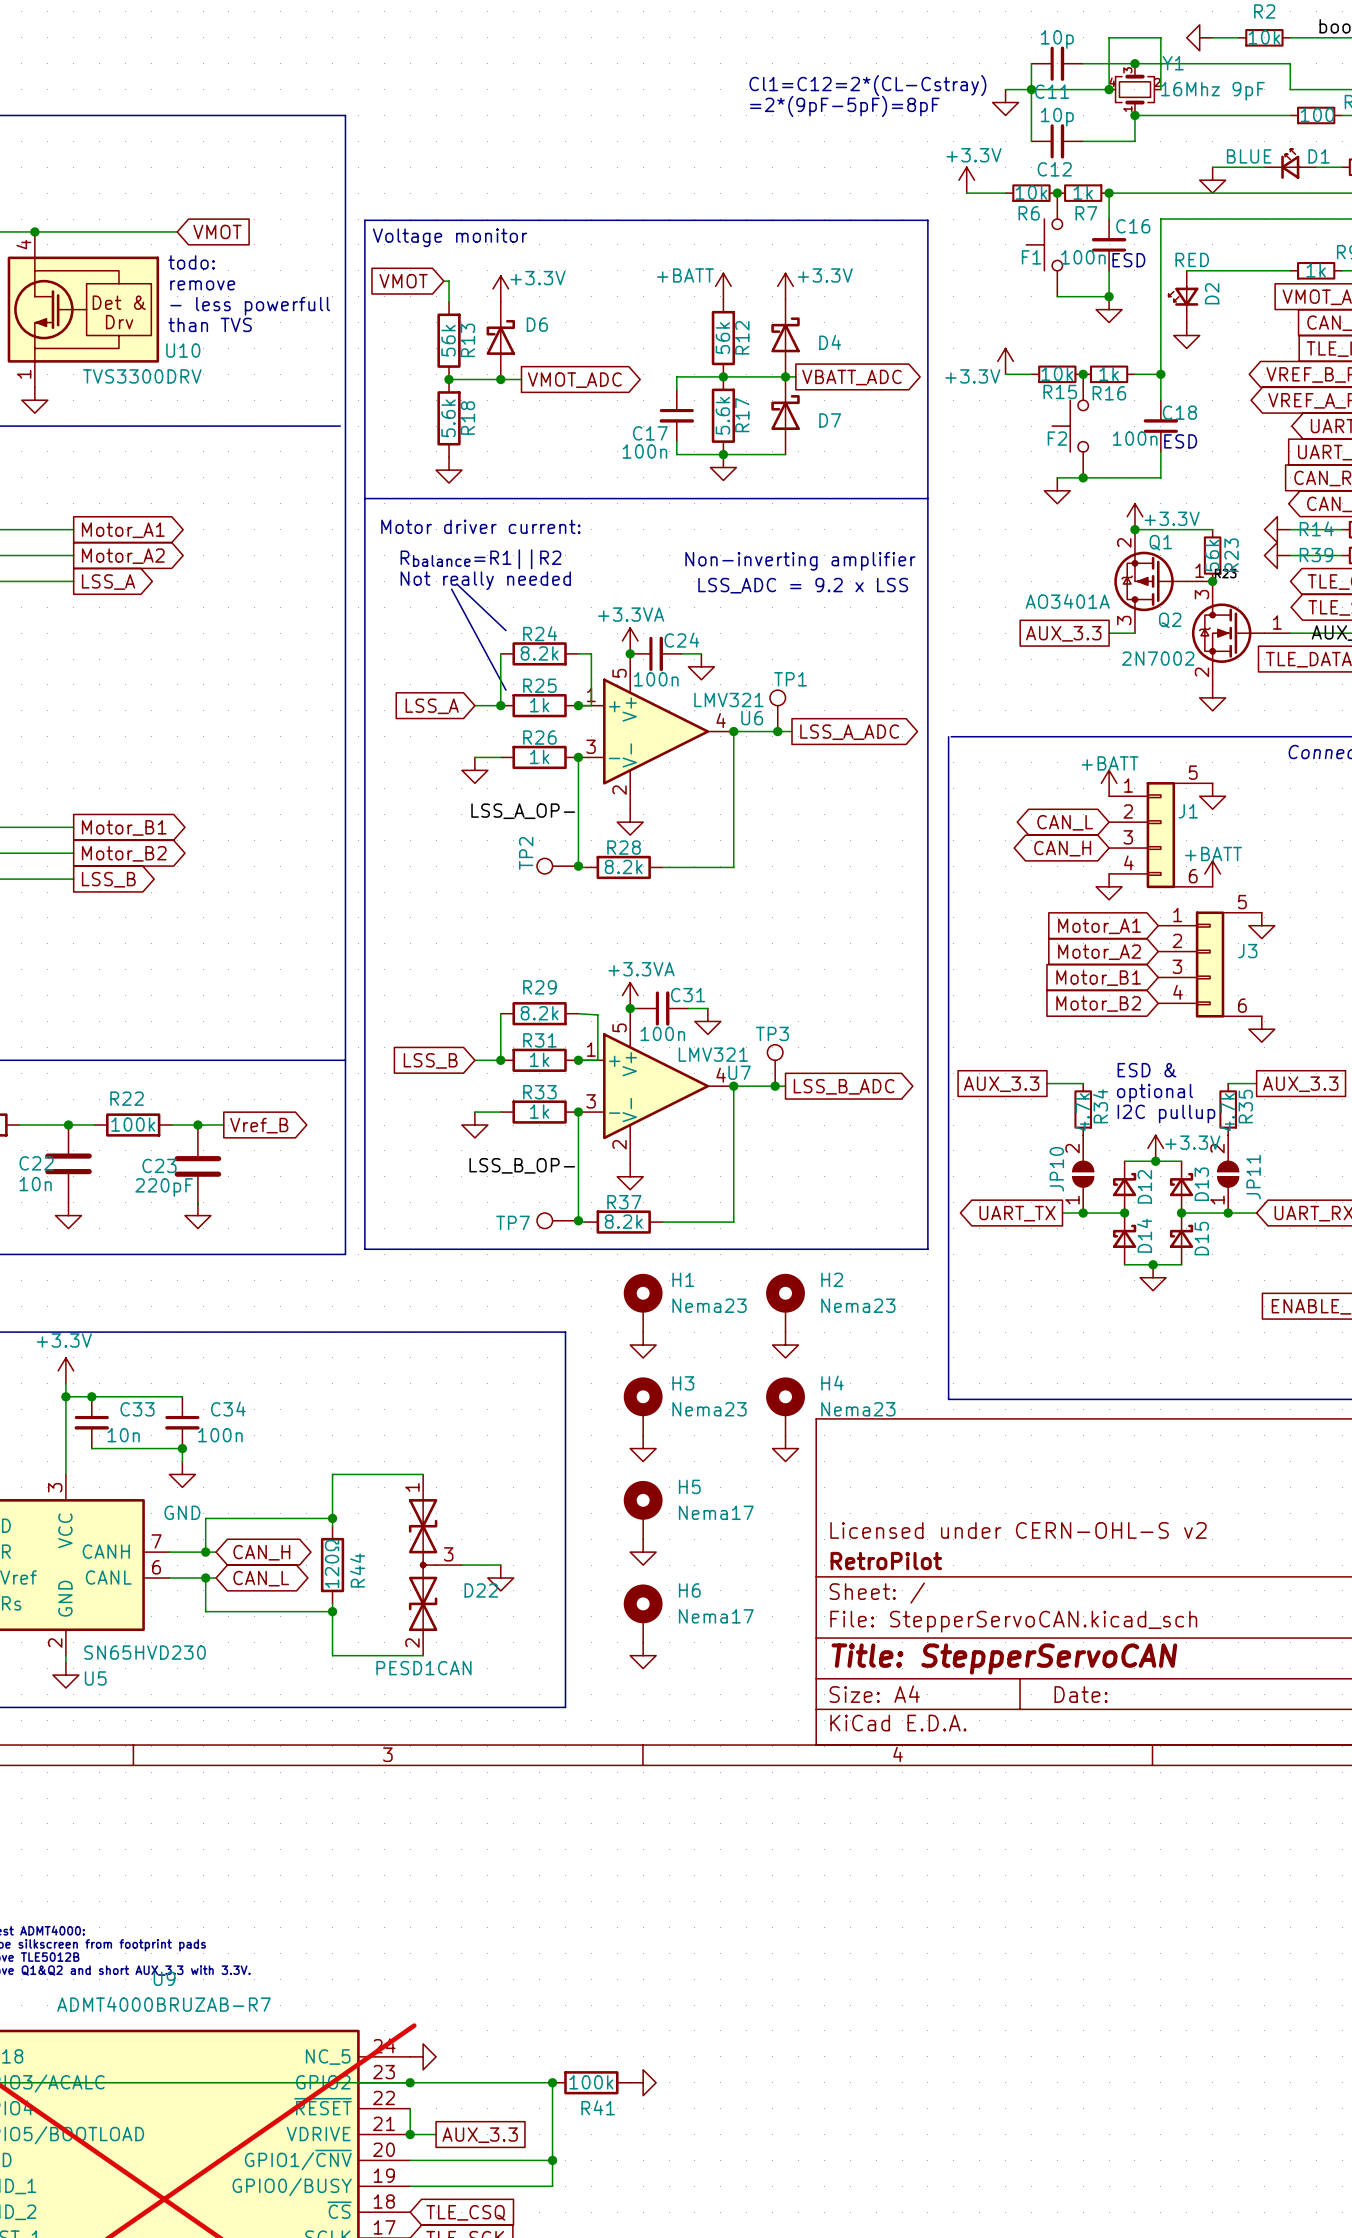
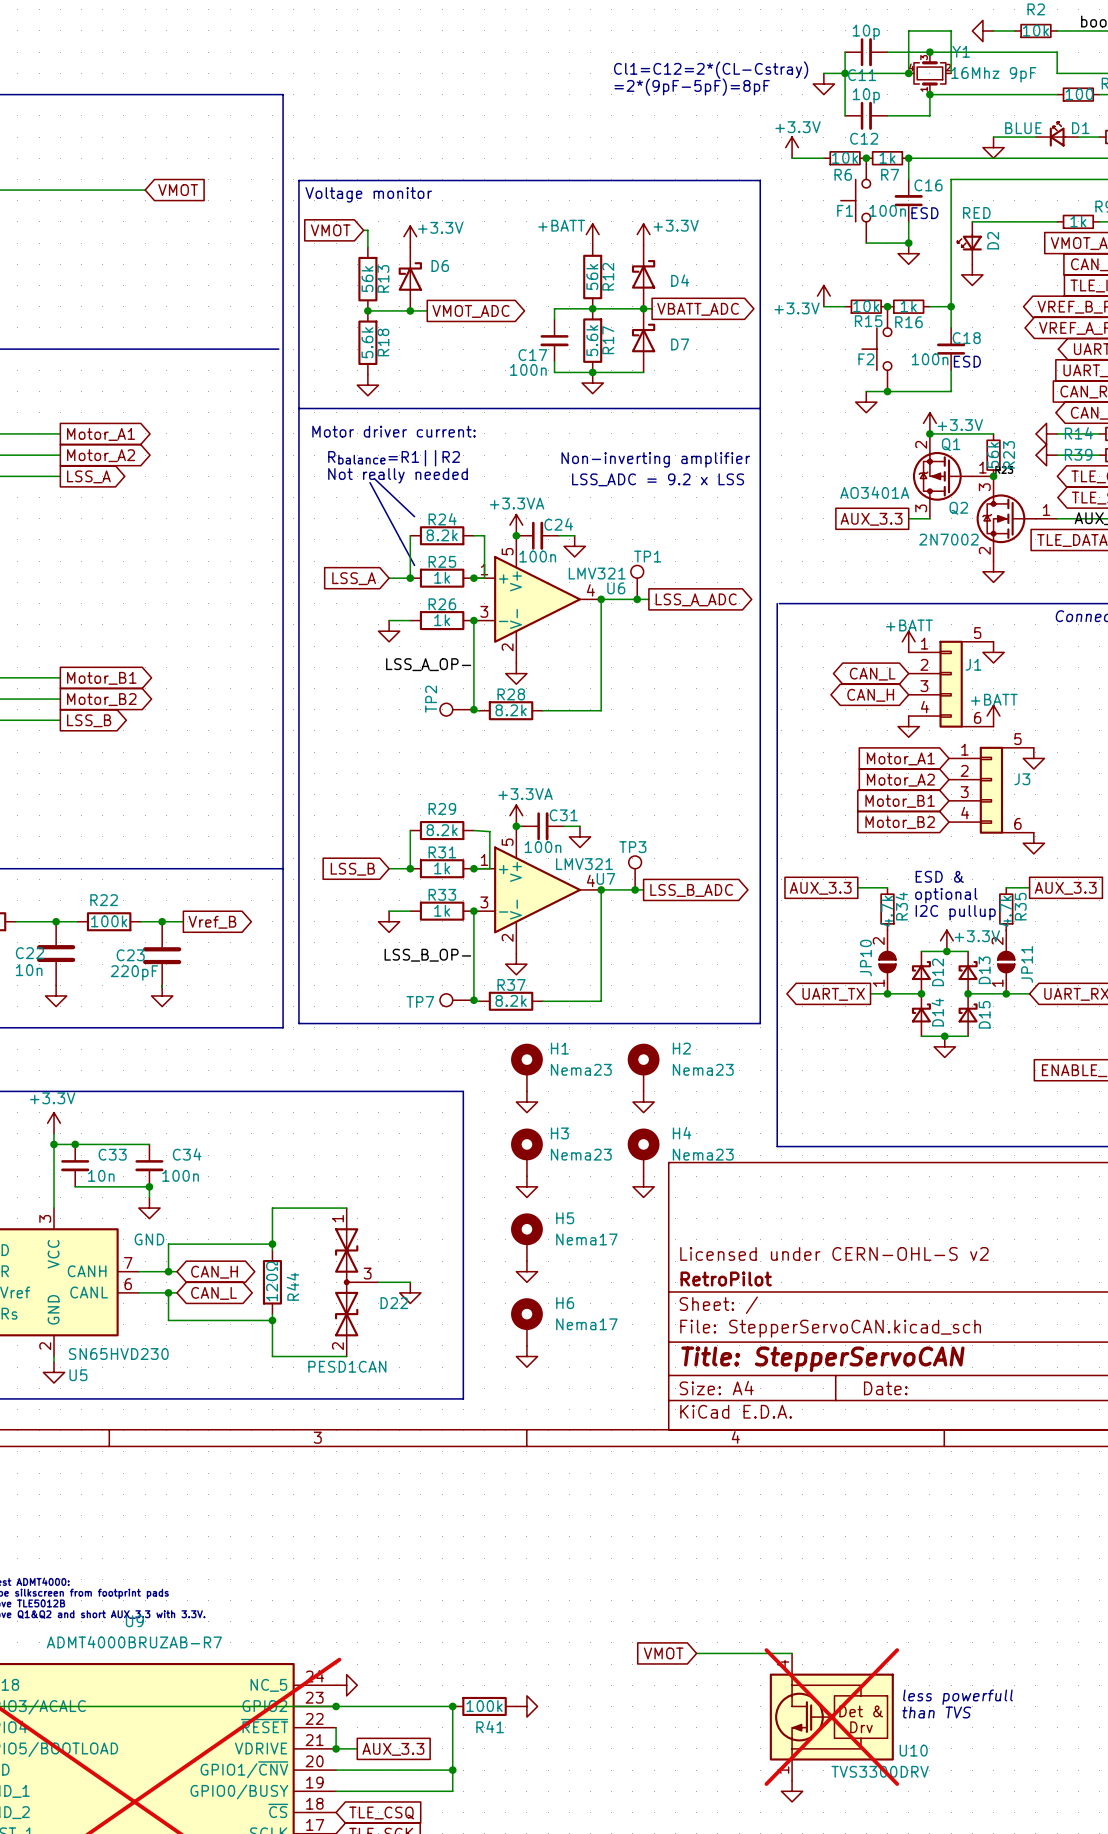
junction: (34, 231) -> none
text: todo: (191, 262) -> none
text: remove (202, 285) -> none
text: - less powerfull (250, 306) -> none
U10 position: (83, 309) -> (831, 1717)
text: than TVS (210, 324) -> none
power symbol: (34, 400) -> none
global label: none -> VMOT (663, 1653)
wire: none -> (696, 1653) (792, 1653)
text: none -> less powerfull (957, 1697)
text: none -> than TVS (936, 1712)
U10 do-not-place cross: none -> (831, 1717)
power symbol: none -> (792, 1791)

